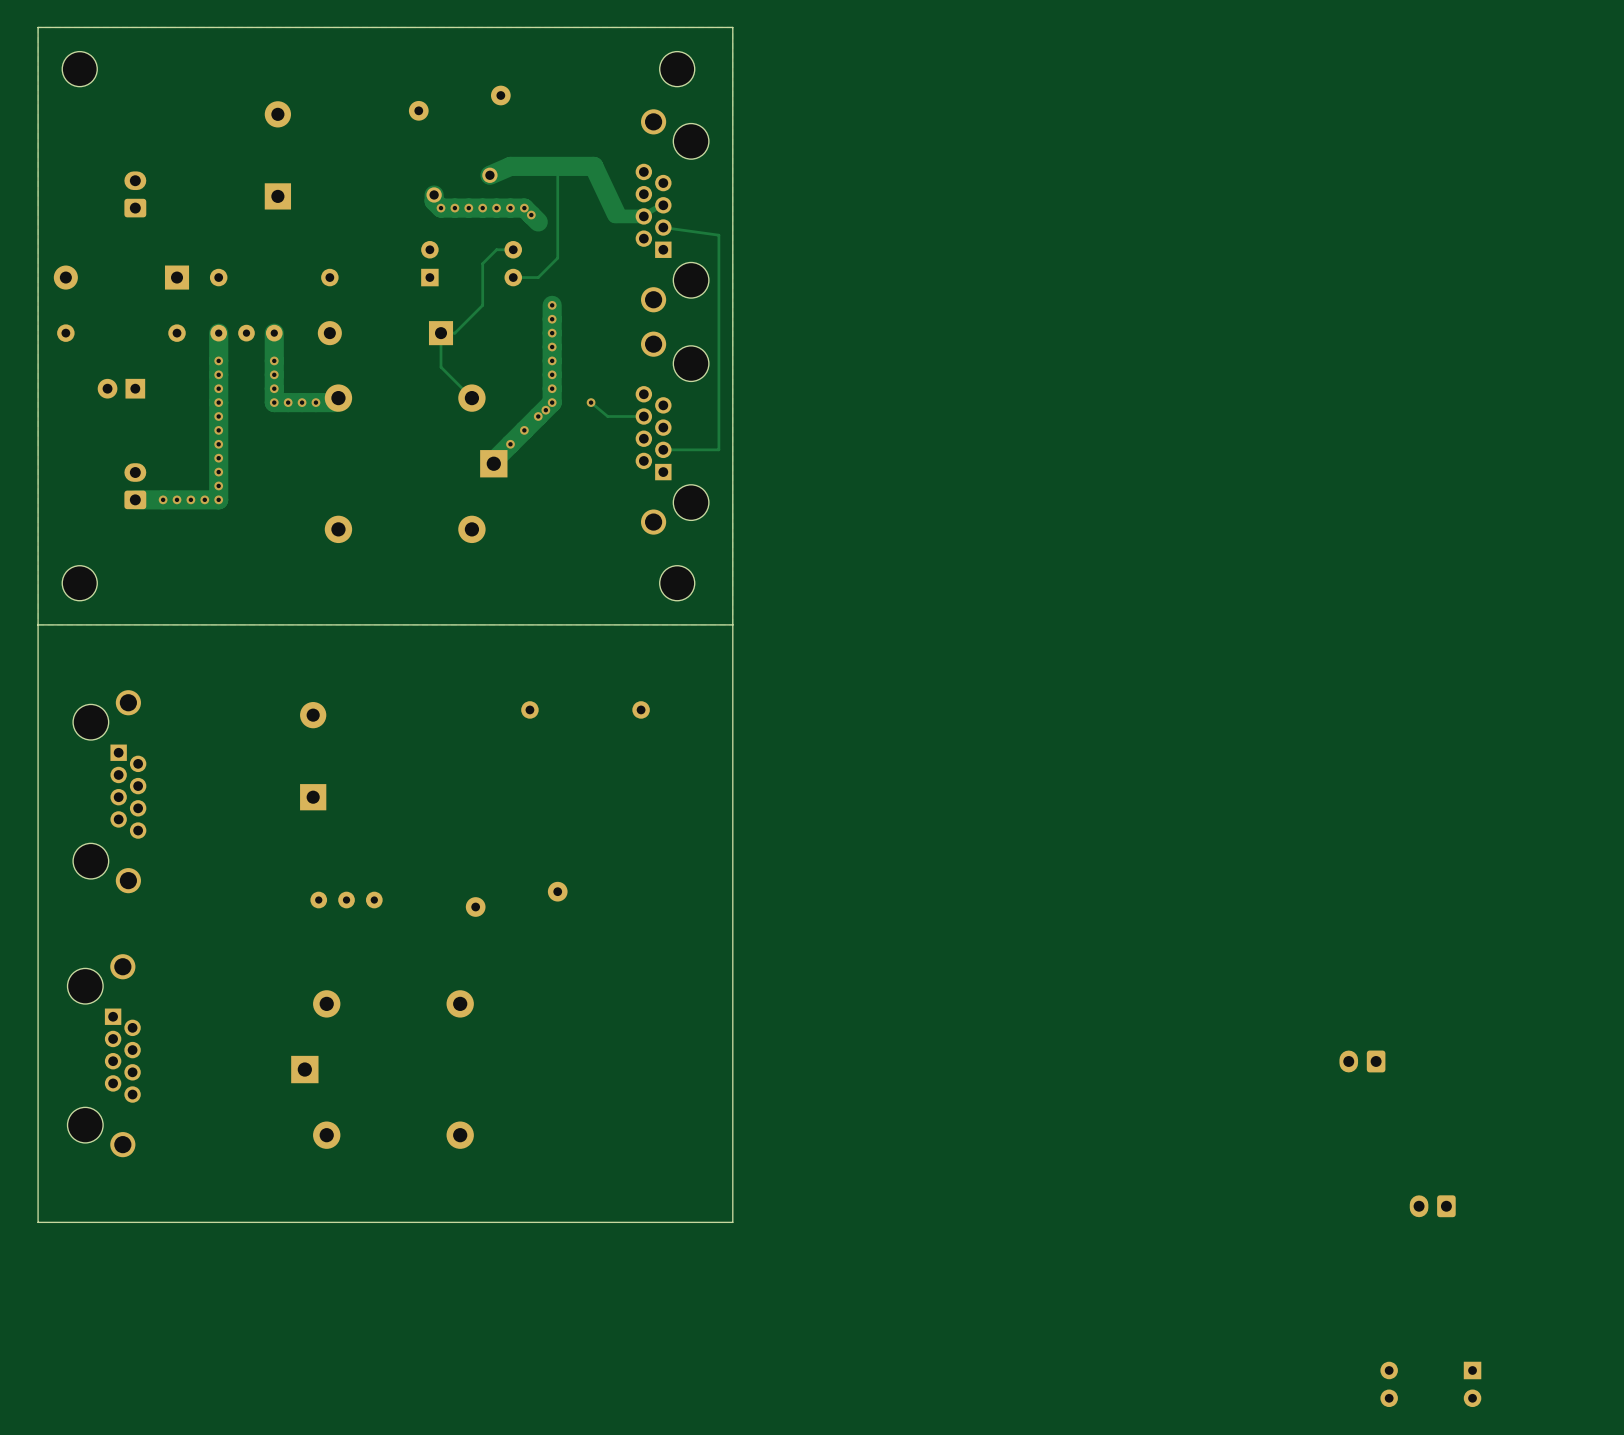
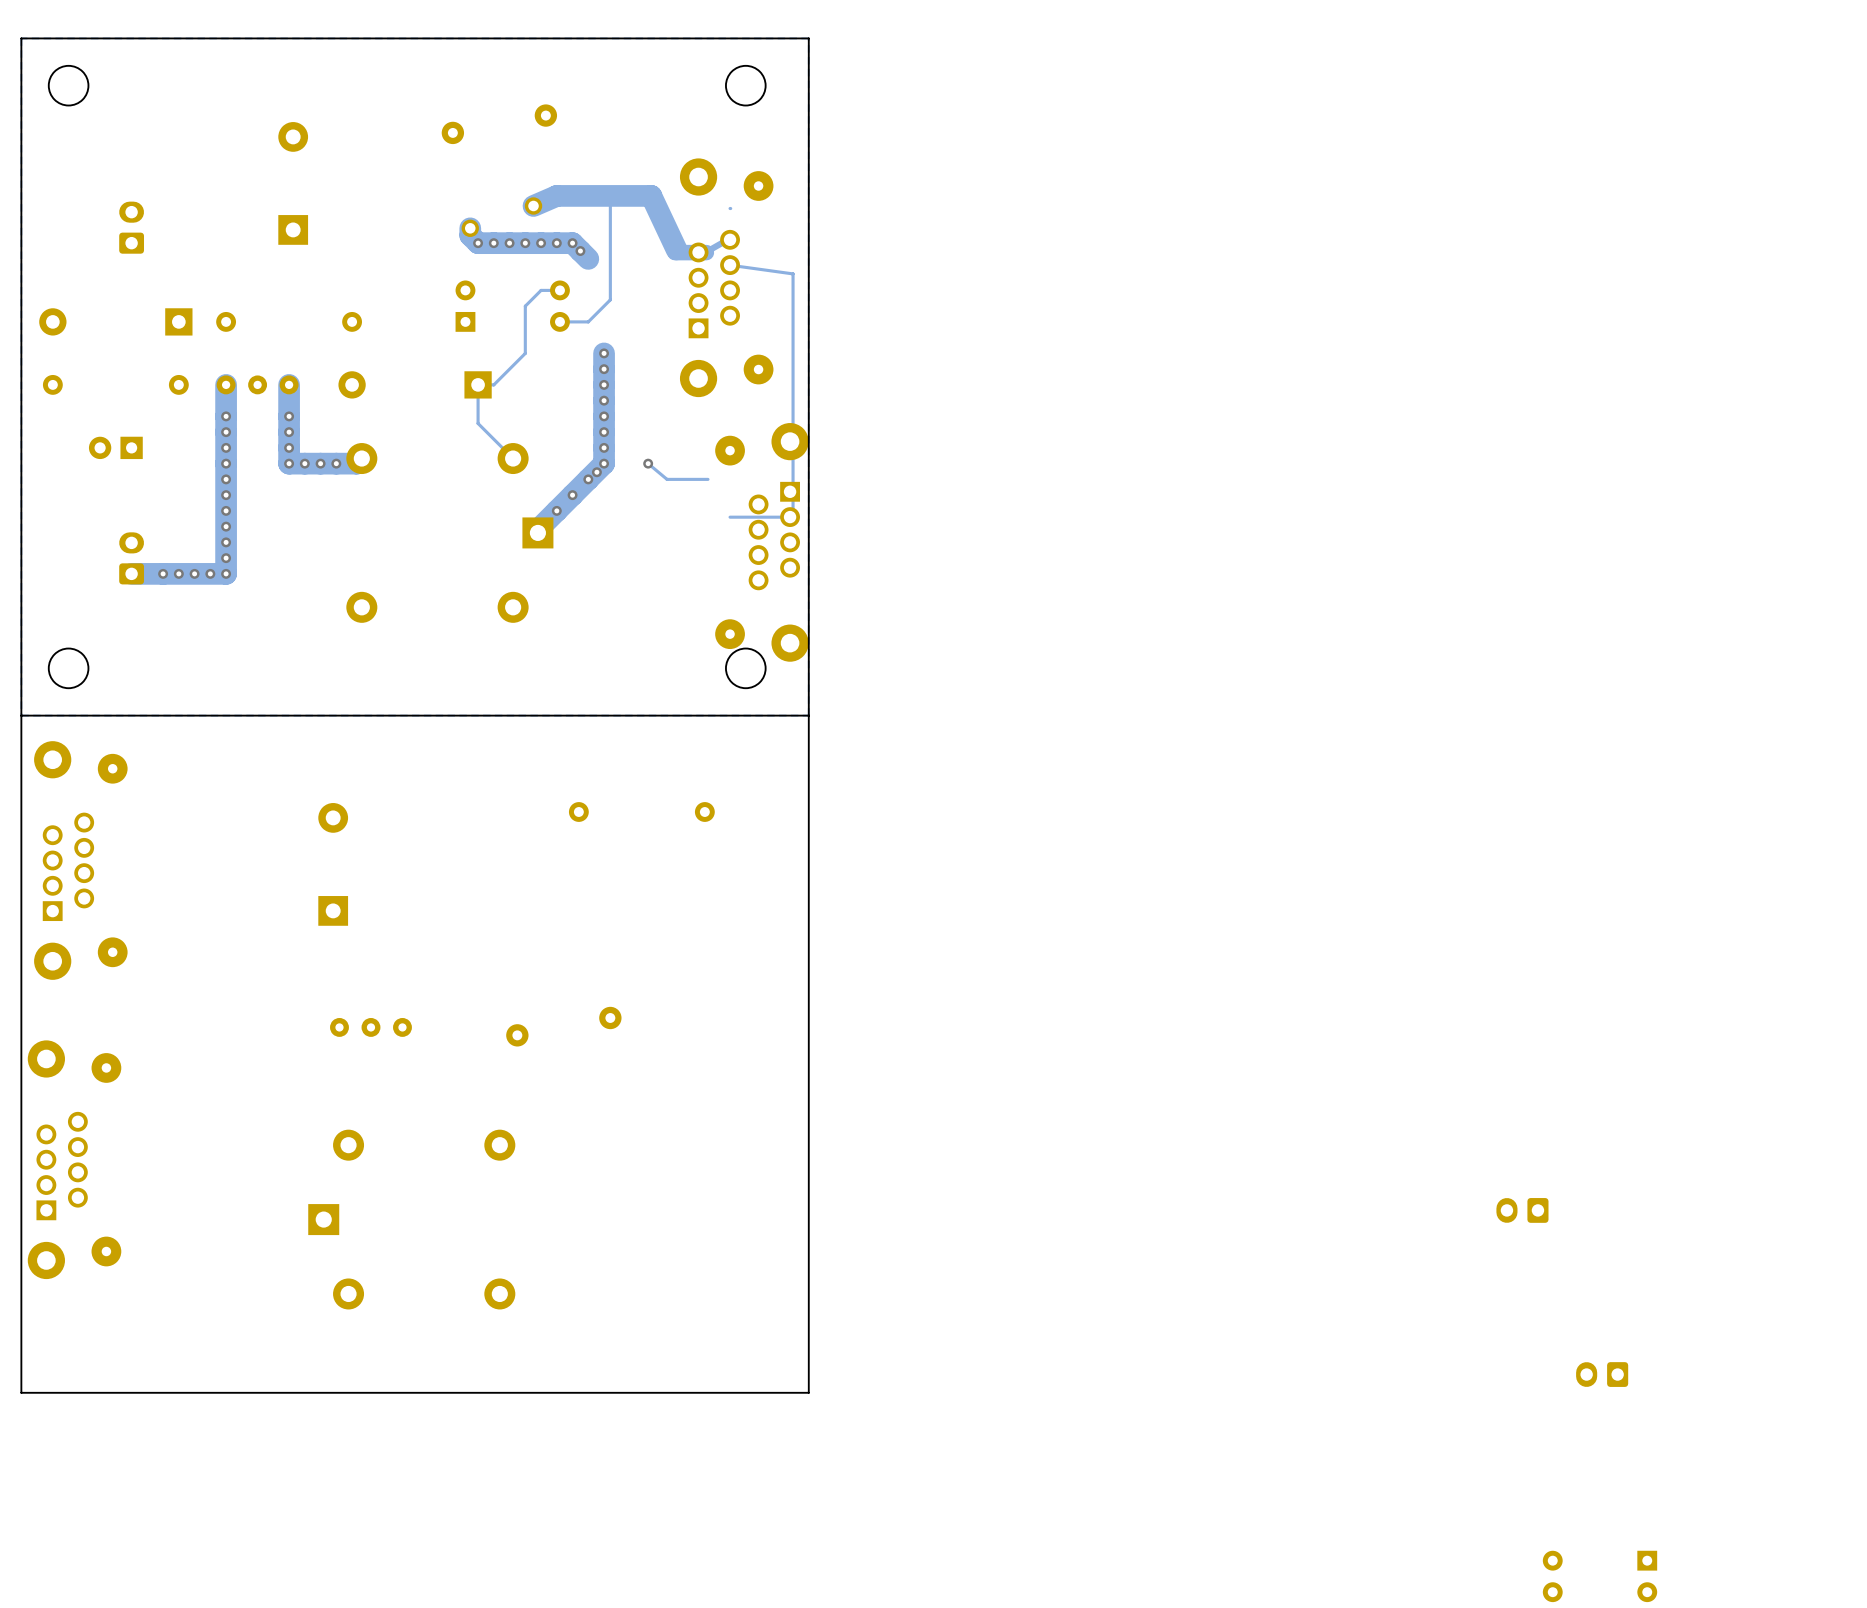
part: (672, 210) -> none
part: none -> (726, 277)
part: (672, 433) -> none
part: none -> (761, 542)
part: none -> (80, 860)
part: (109, 791) -> none
part: none -> (74, 1159)
part: (104, 1055) -> none

